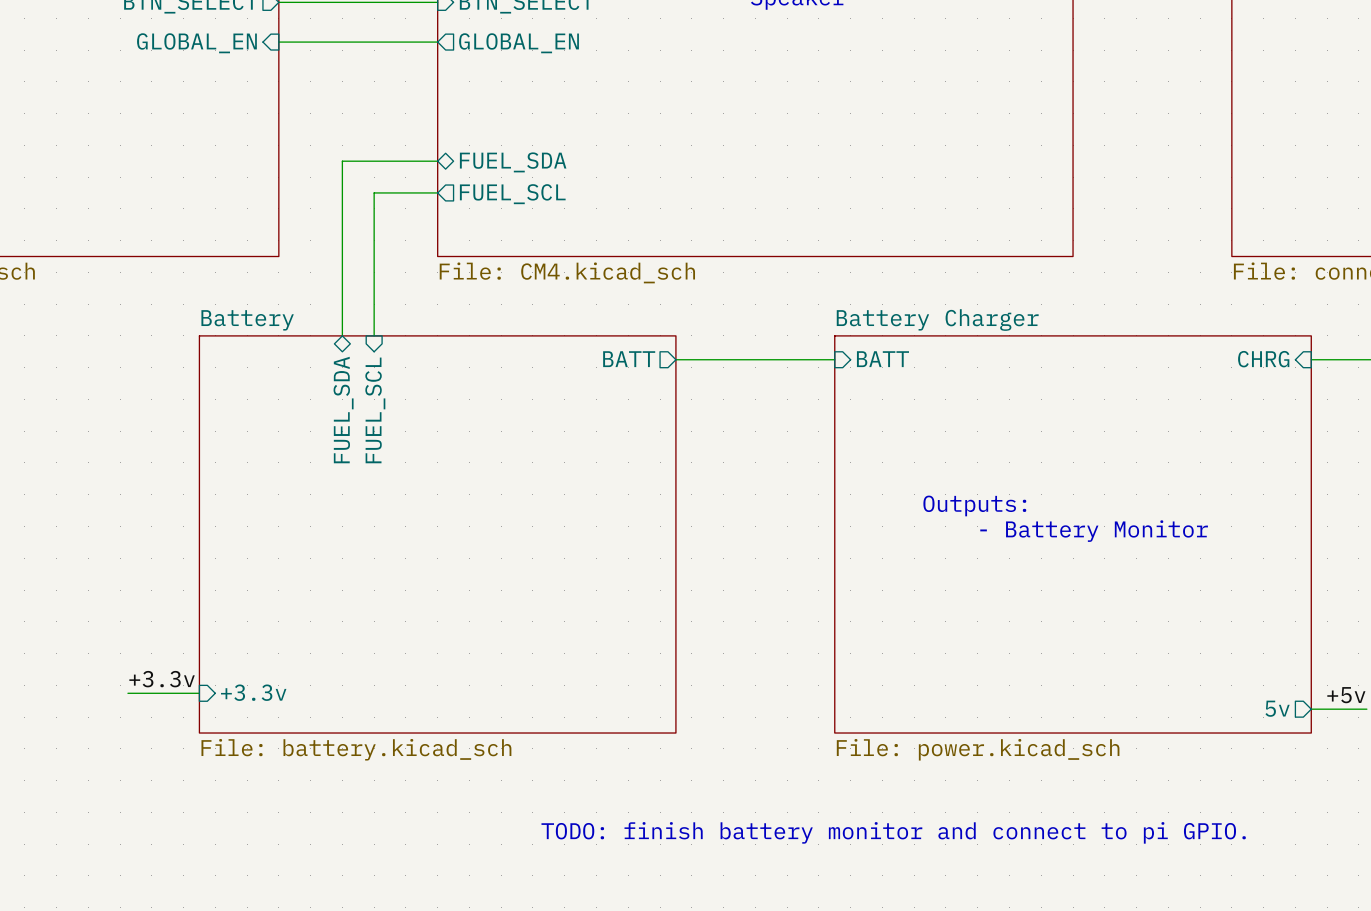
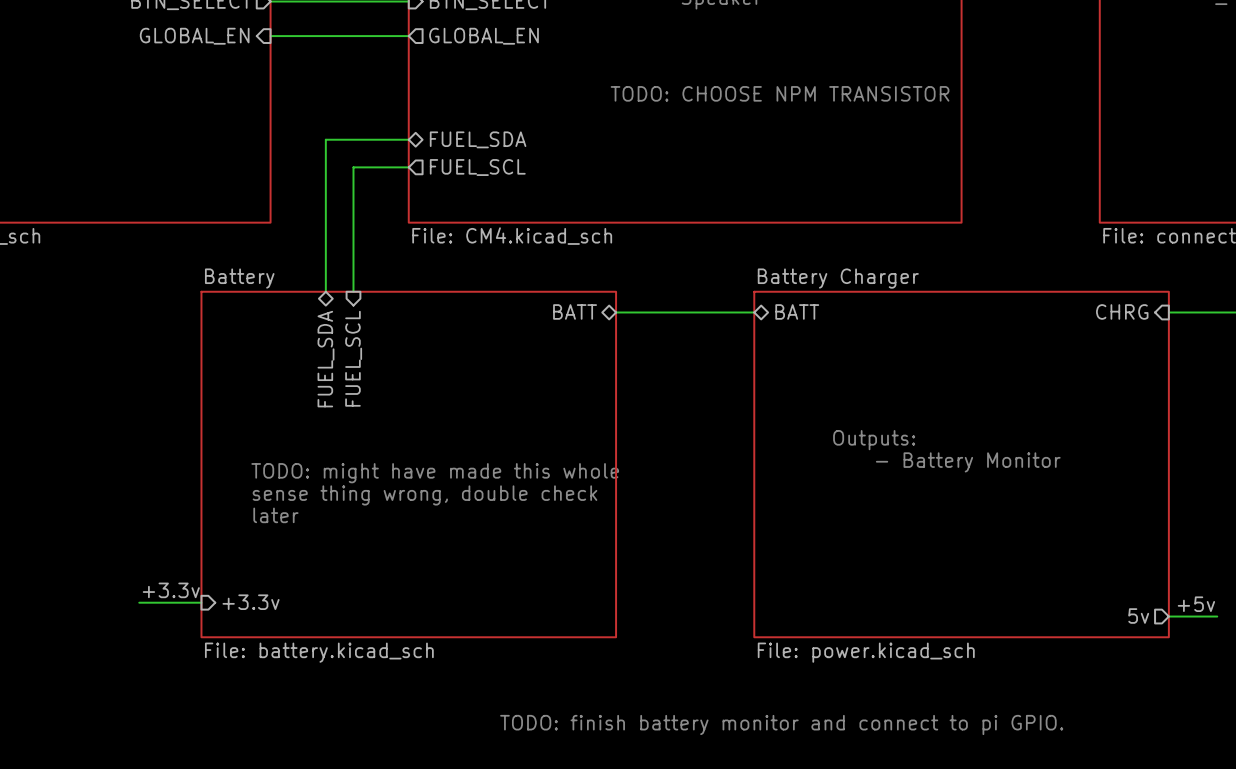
text: none -> TODO: CHOOSE NPM TRANSISTOR (780, 93)
sheet pin shape: output (629, 359) -> bidirectional (575, 311)
sheet pin shape: input (882, 359) -> bidirectional (797, 311)
text: none -> TODO: might have made this whole (435, 473)
text: none -> sense thing wrong, double check (424, 495)
text: none -> later (275, 515)

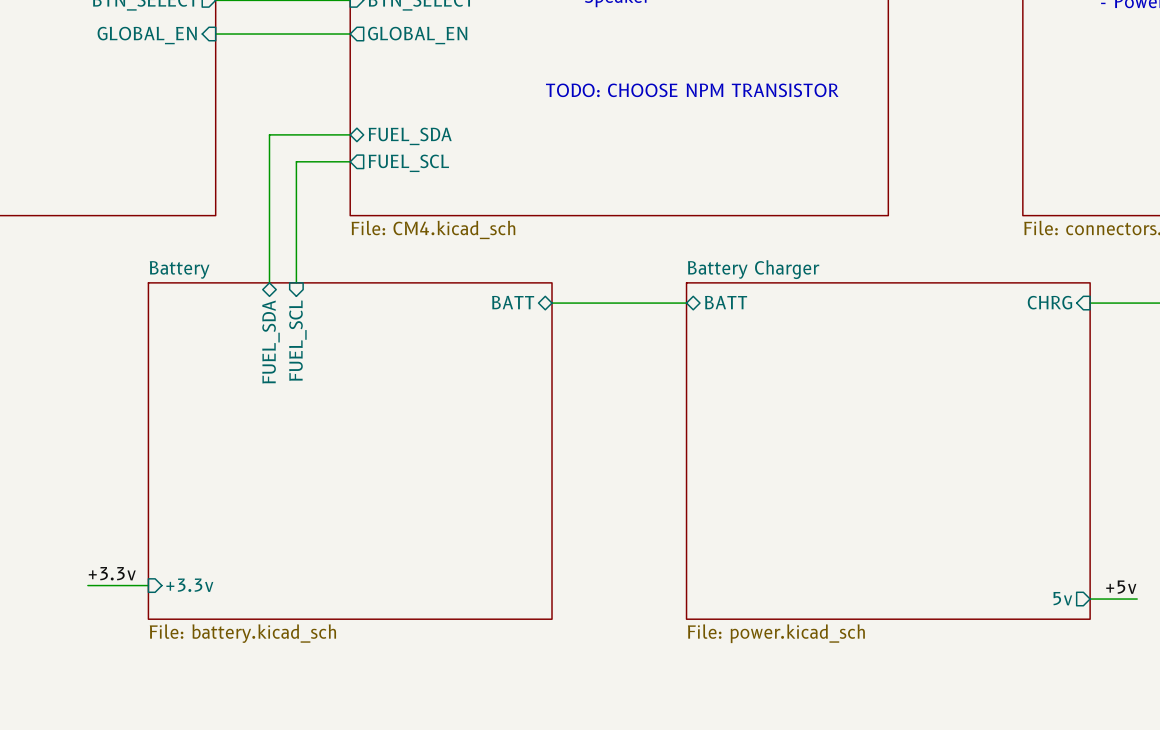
text: Outputs: (874, 440) -> none
text: - Battery Monitor (968, 462) -> none
text: TODO: might have made this whole (435, 473) -> none
text: sense thing wrong, double check (424, 495) -> none
text: later (275, 515) -> none
text: TODO: finish battery monitor and connect to pi GPIO. (781, 724) -> none

